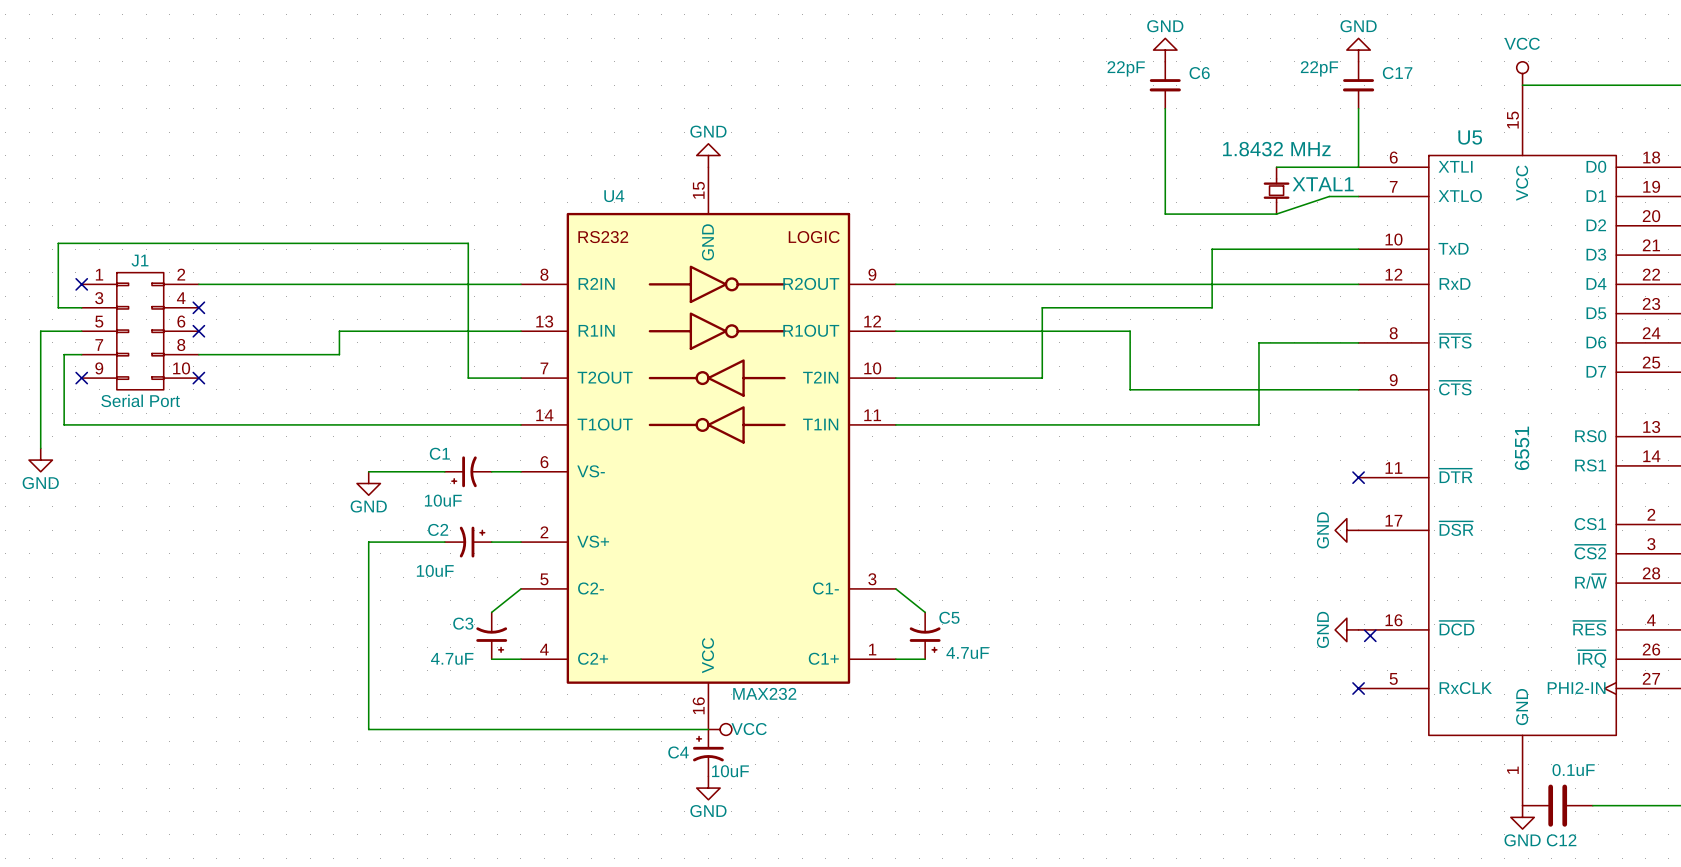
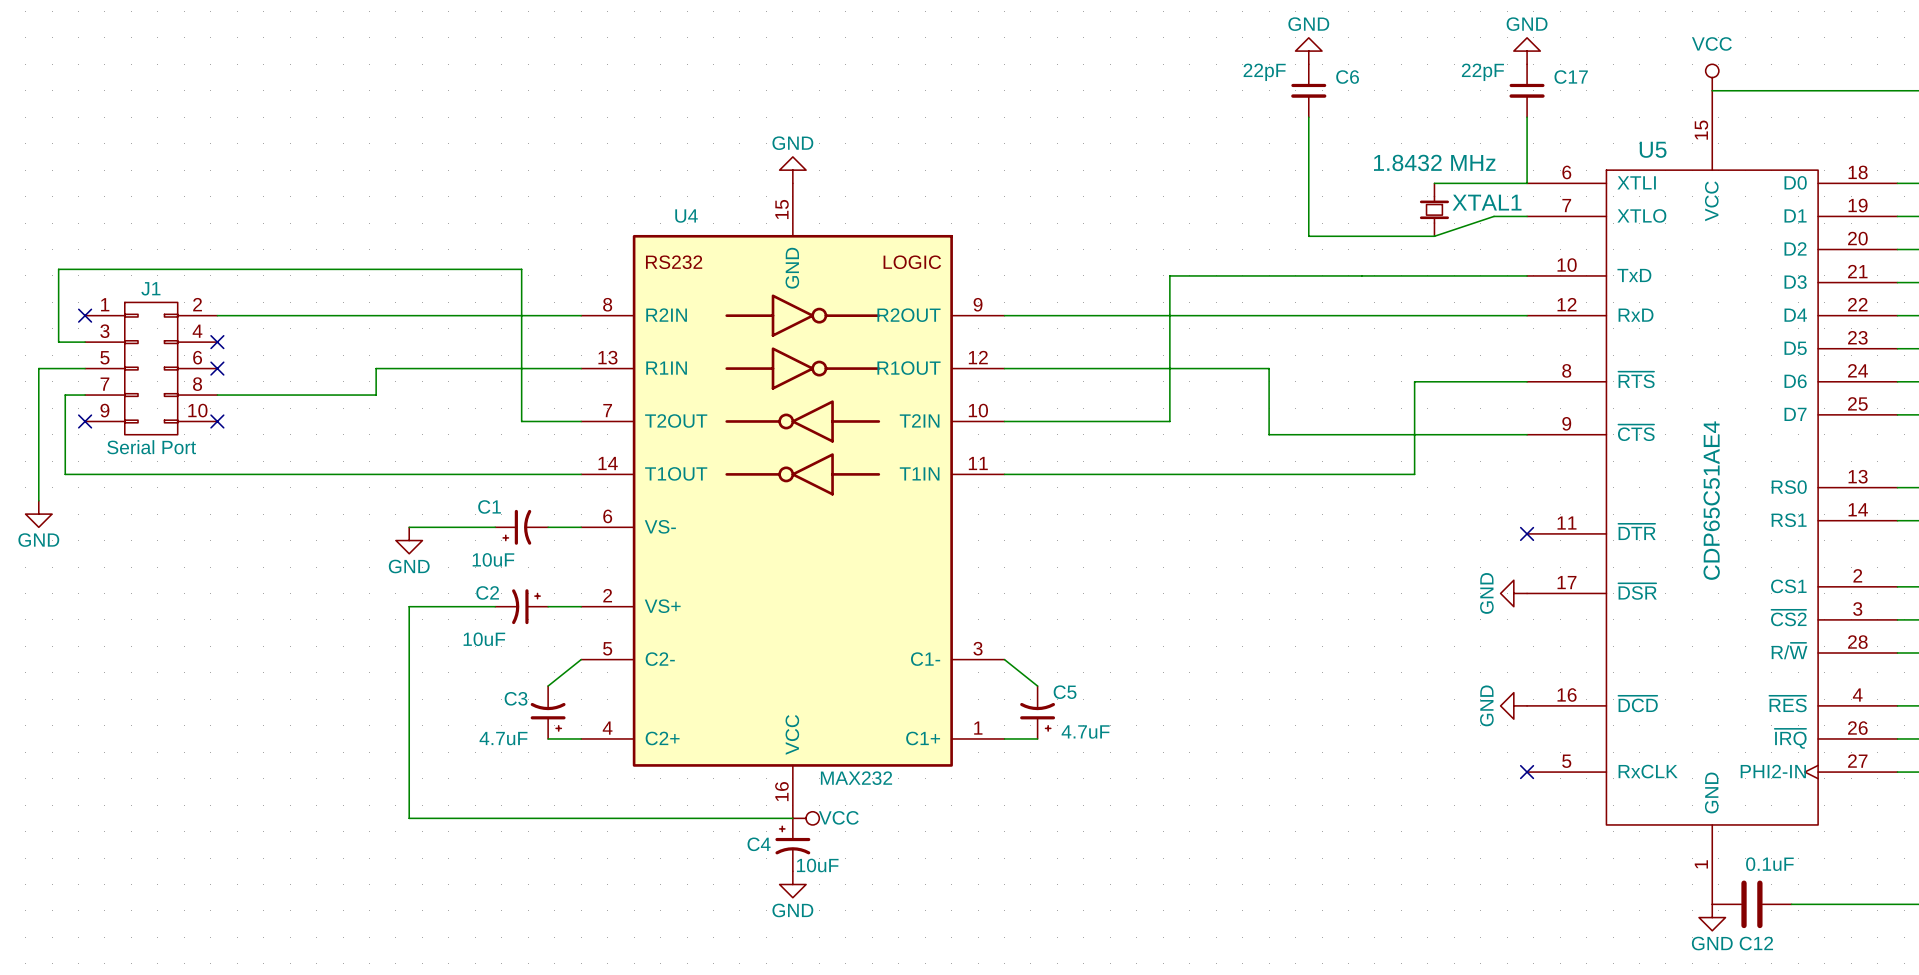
wire: (1212, 249) (1212, 307) (1042, 307) -> (1361, 275) (1169, 275) (1169, 342)
U5 value: 6551 (1522, 448) -> CDP65C51AE4 (1711, 500)
no-connect mark: (1370, 635) -> none

